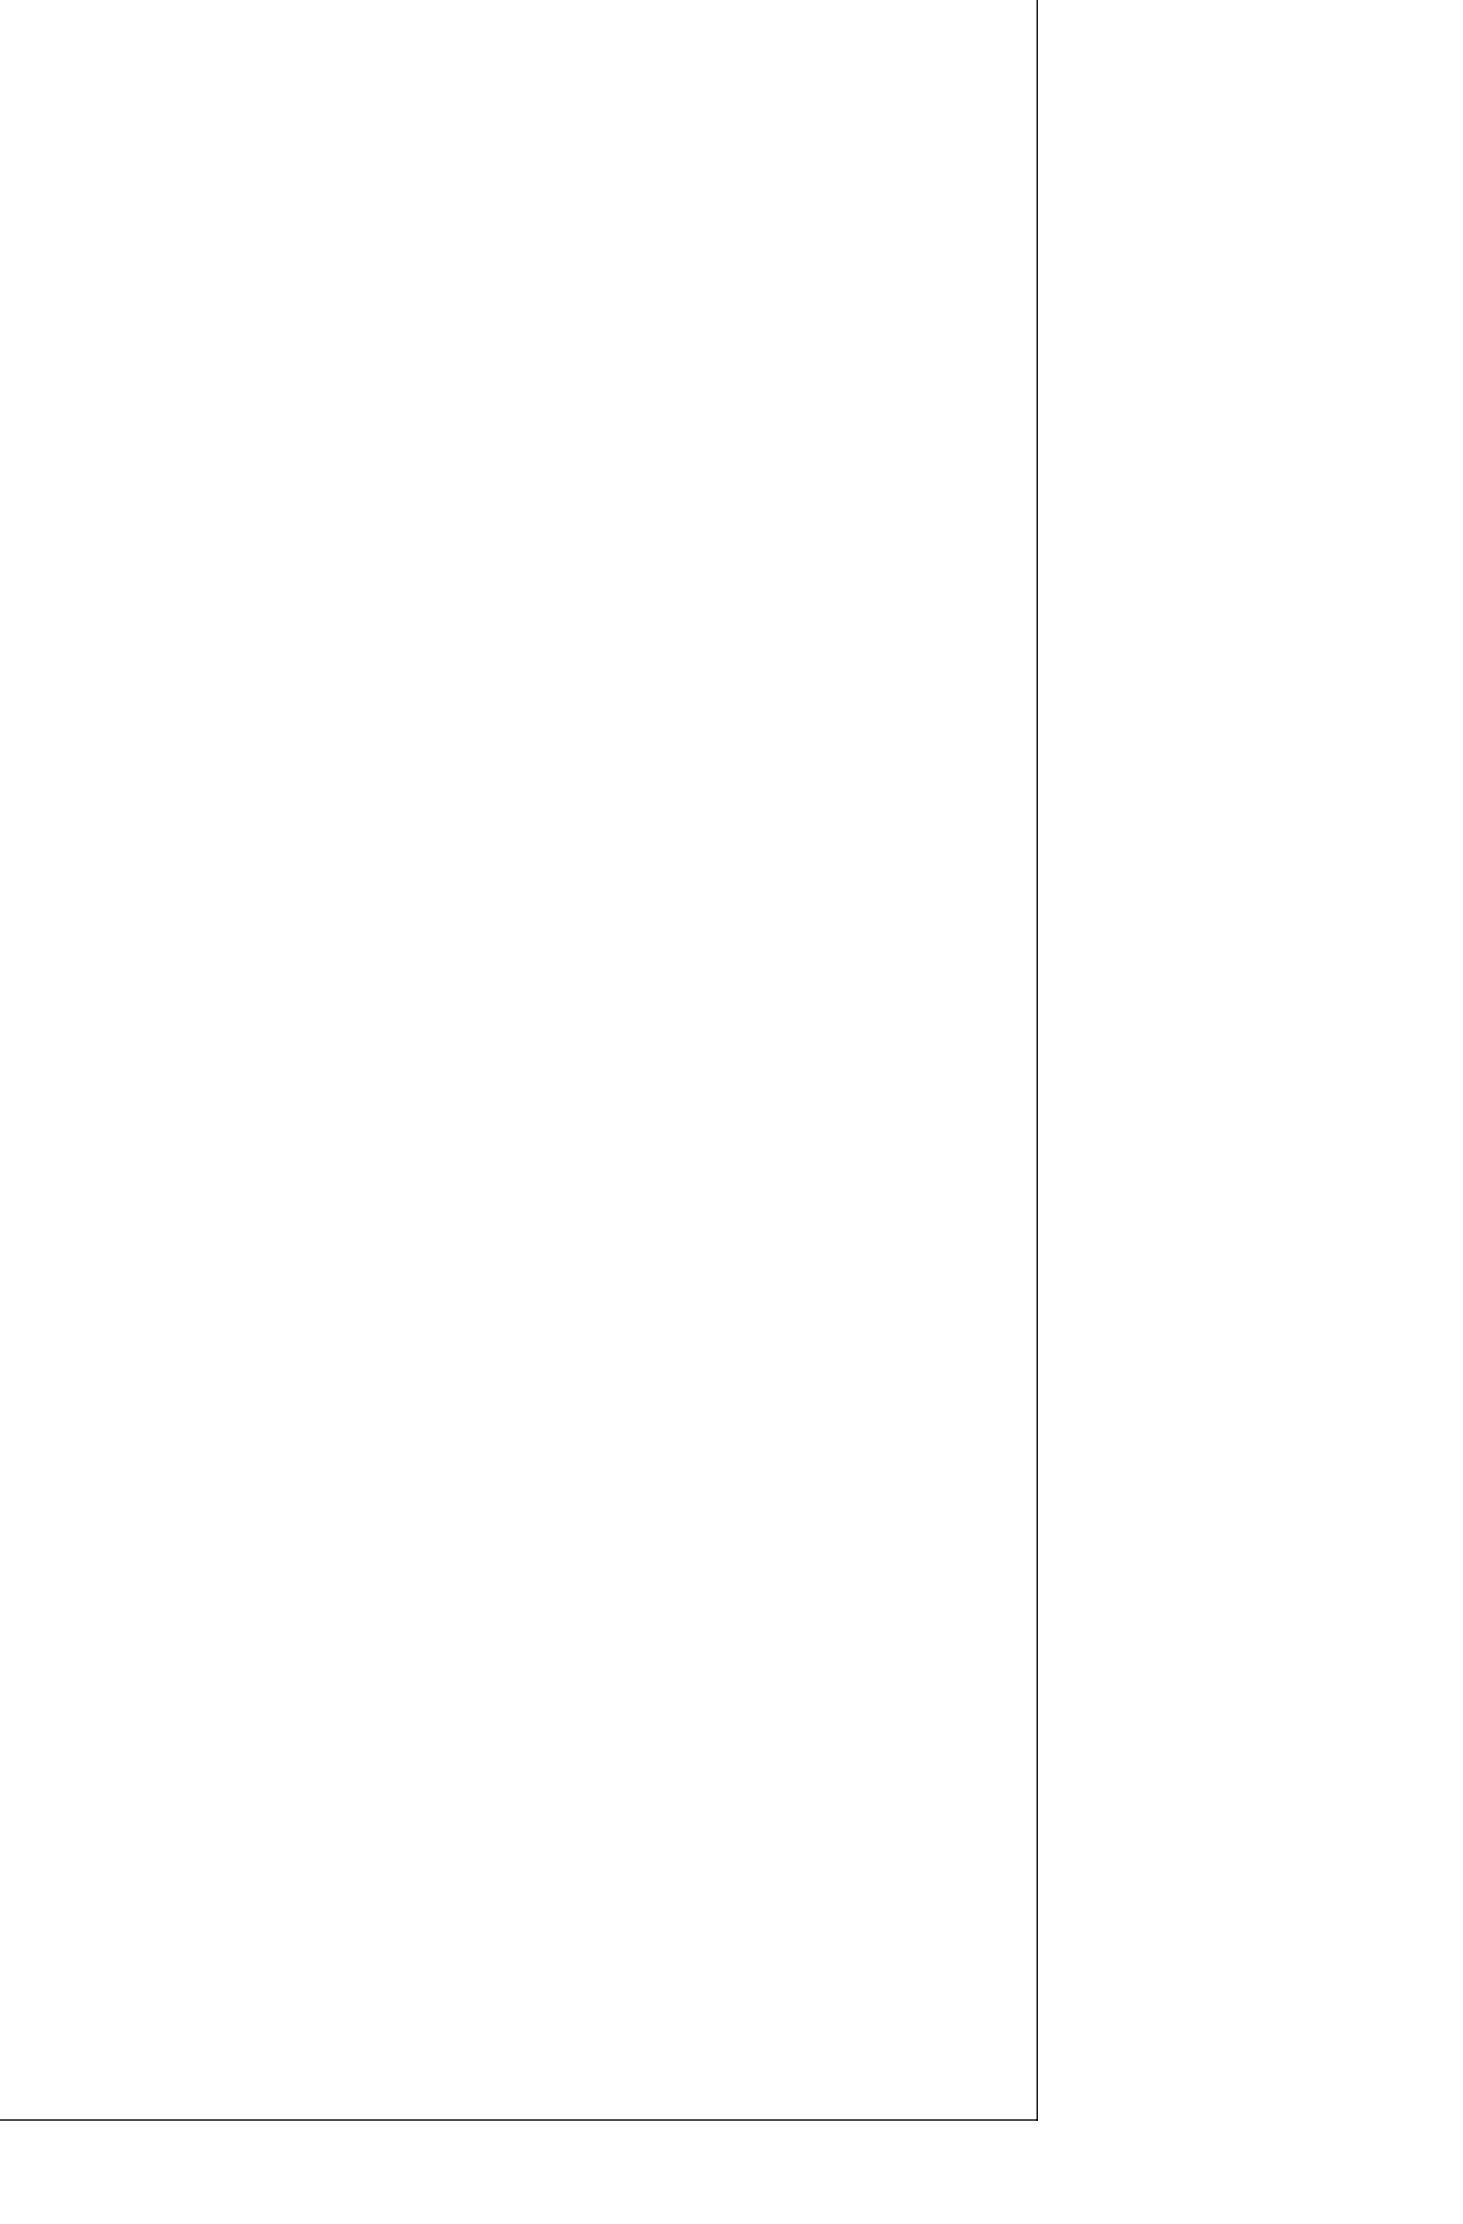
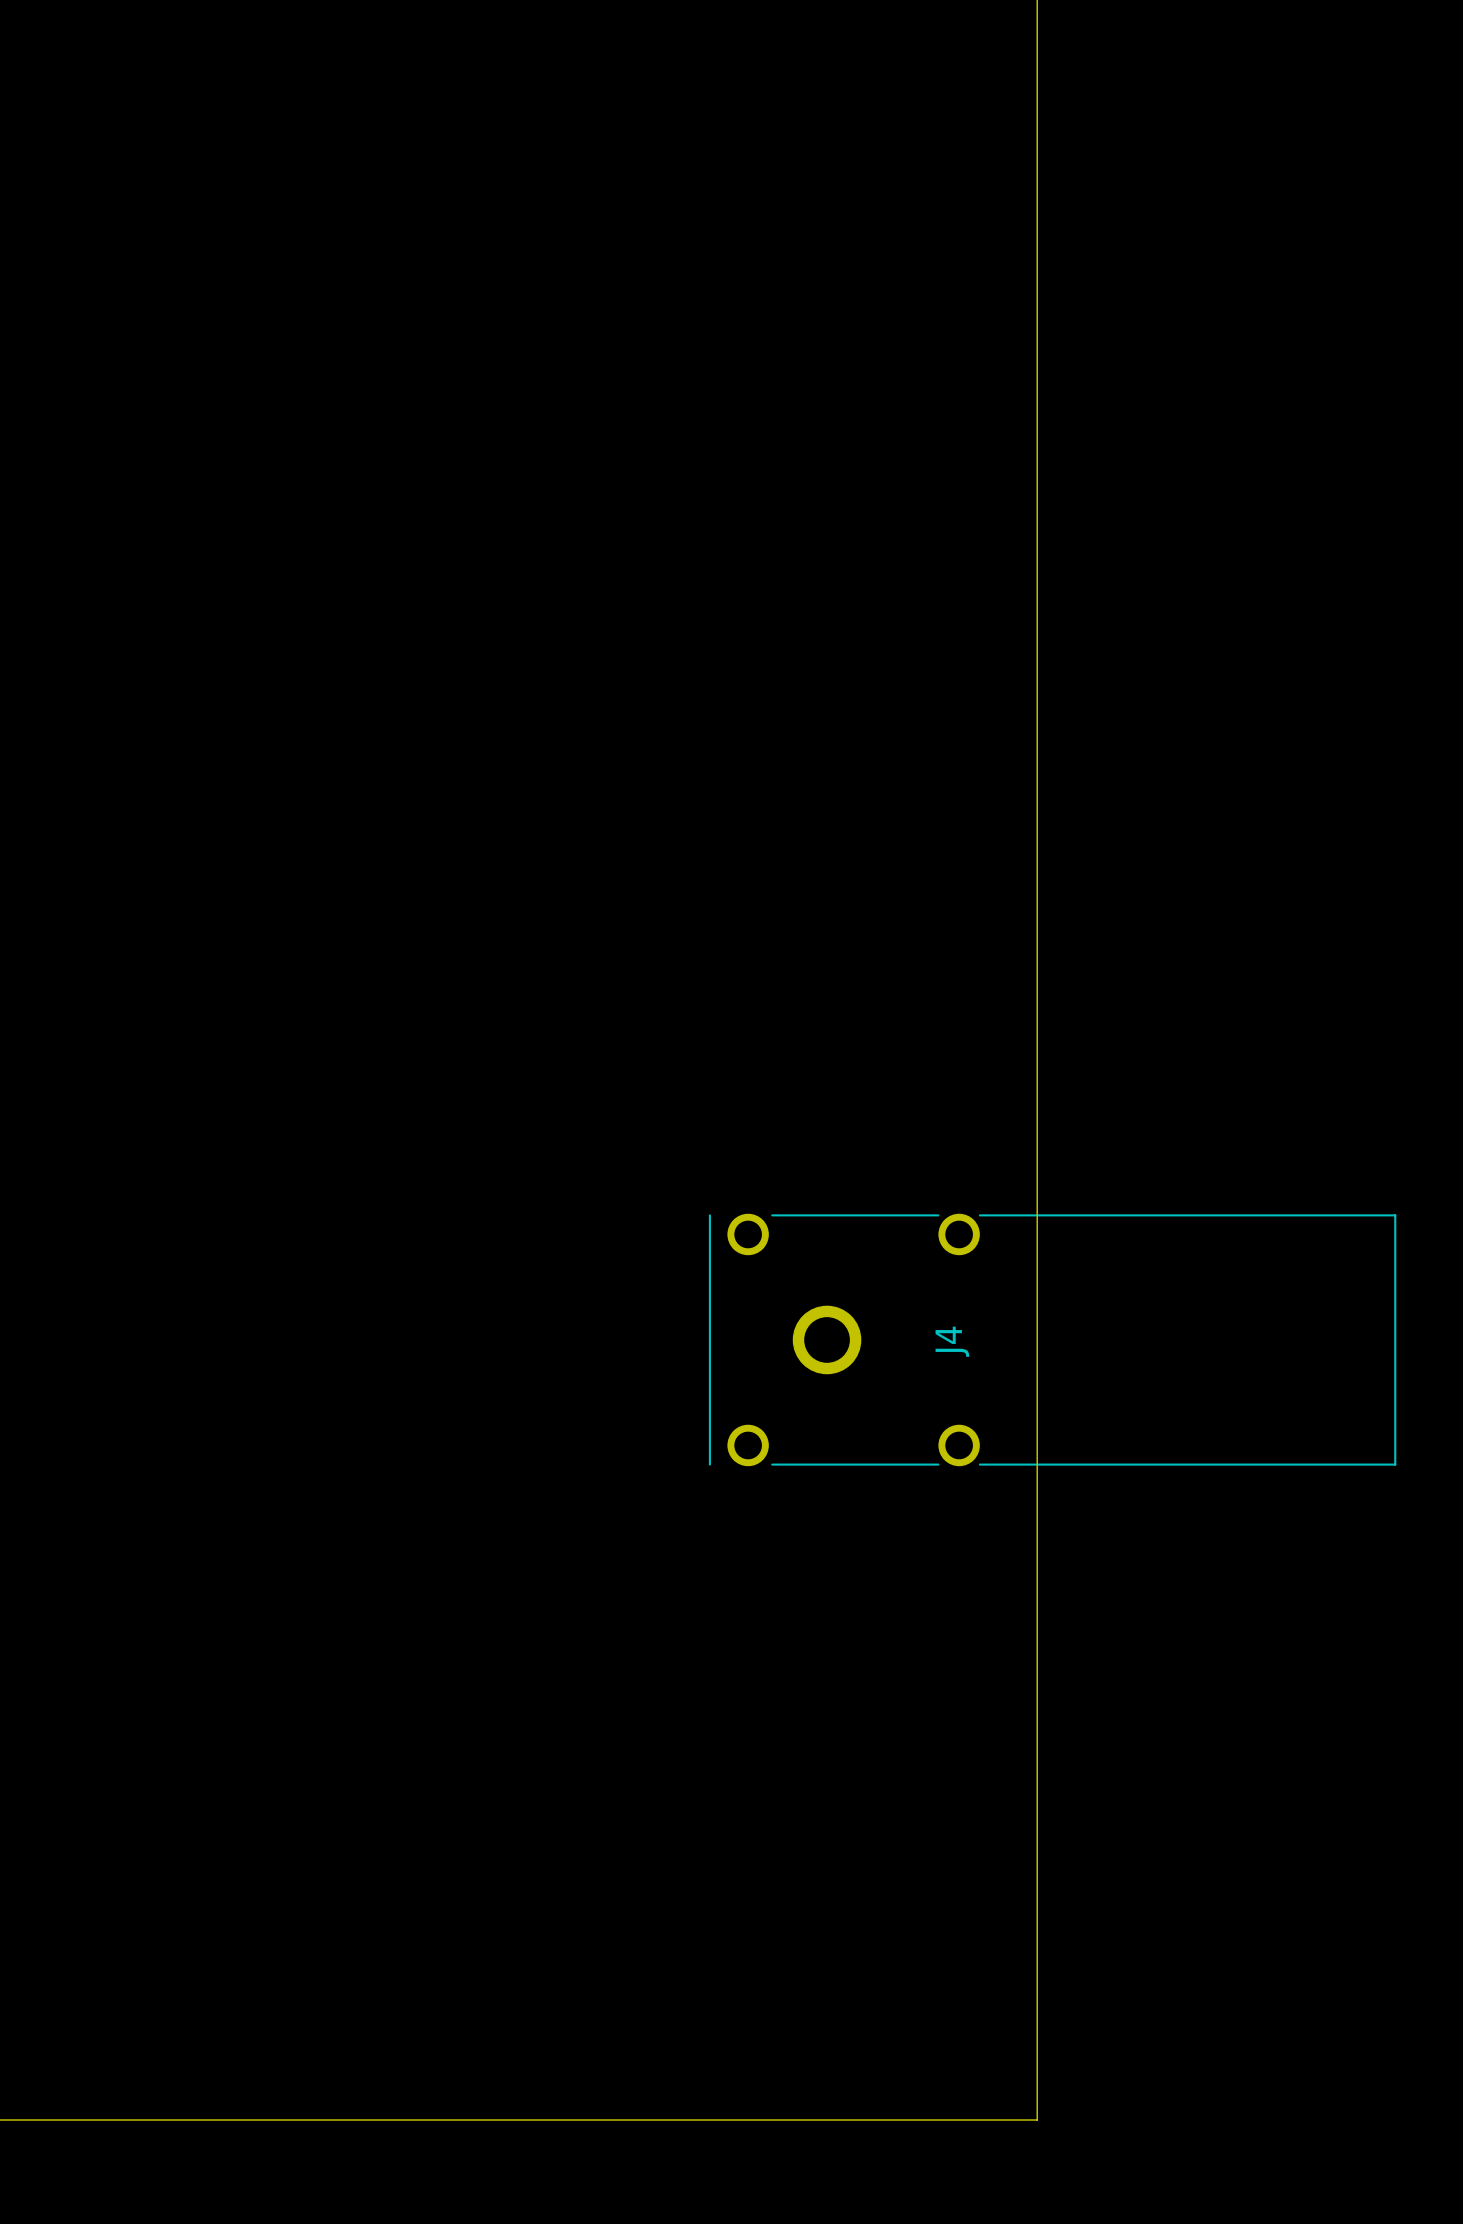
J4: none -> (1052, 1339)

